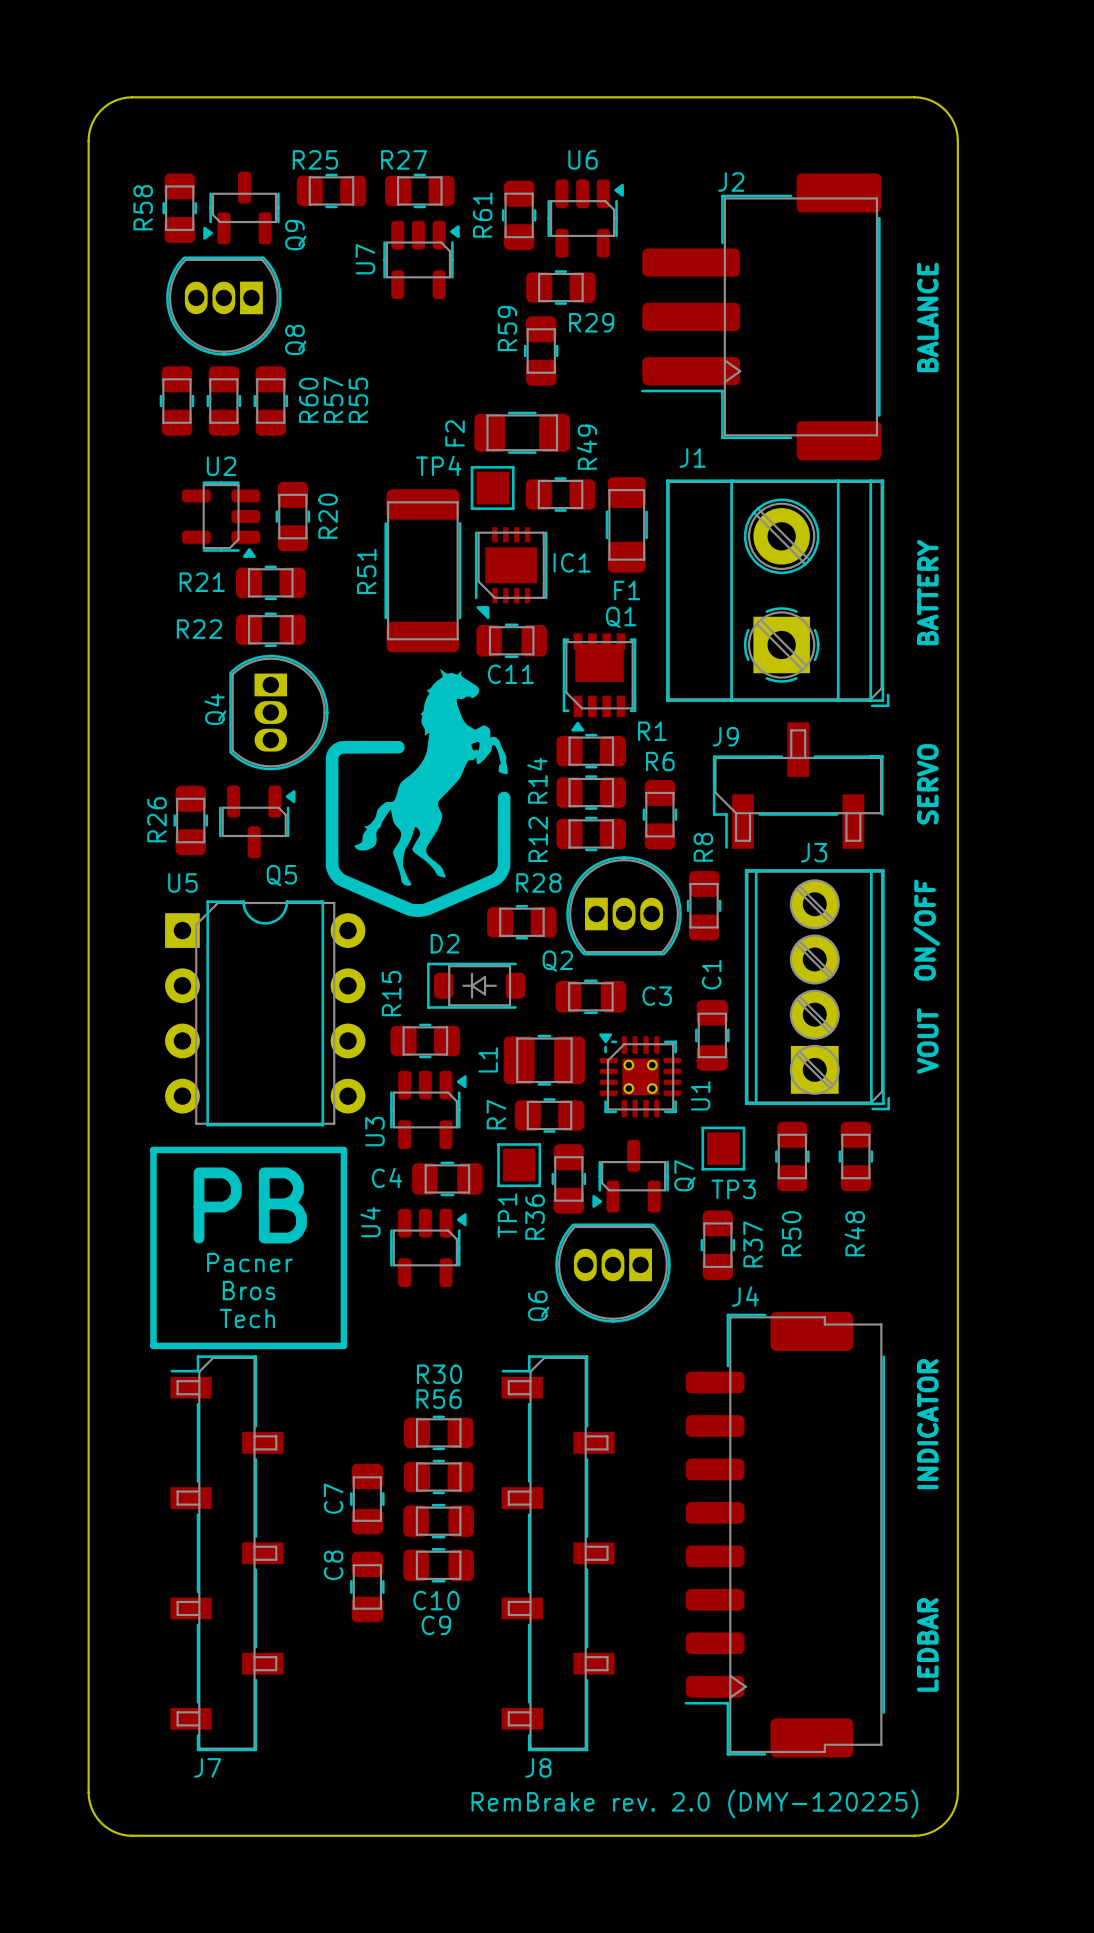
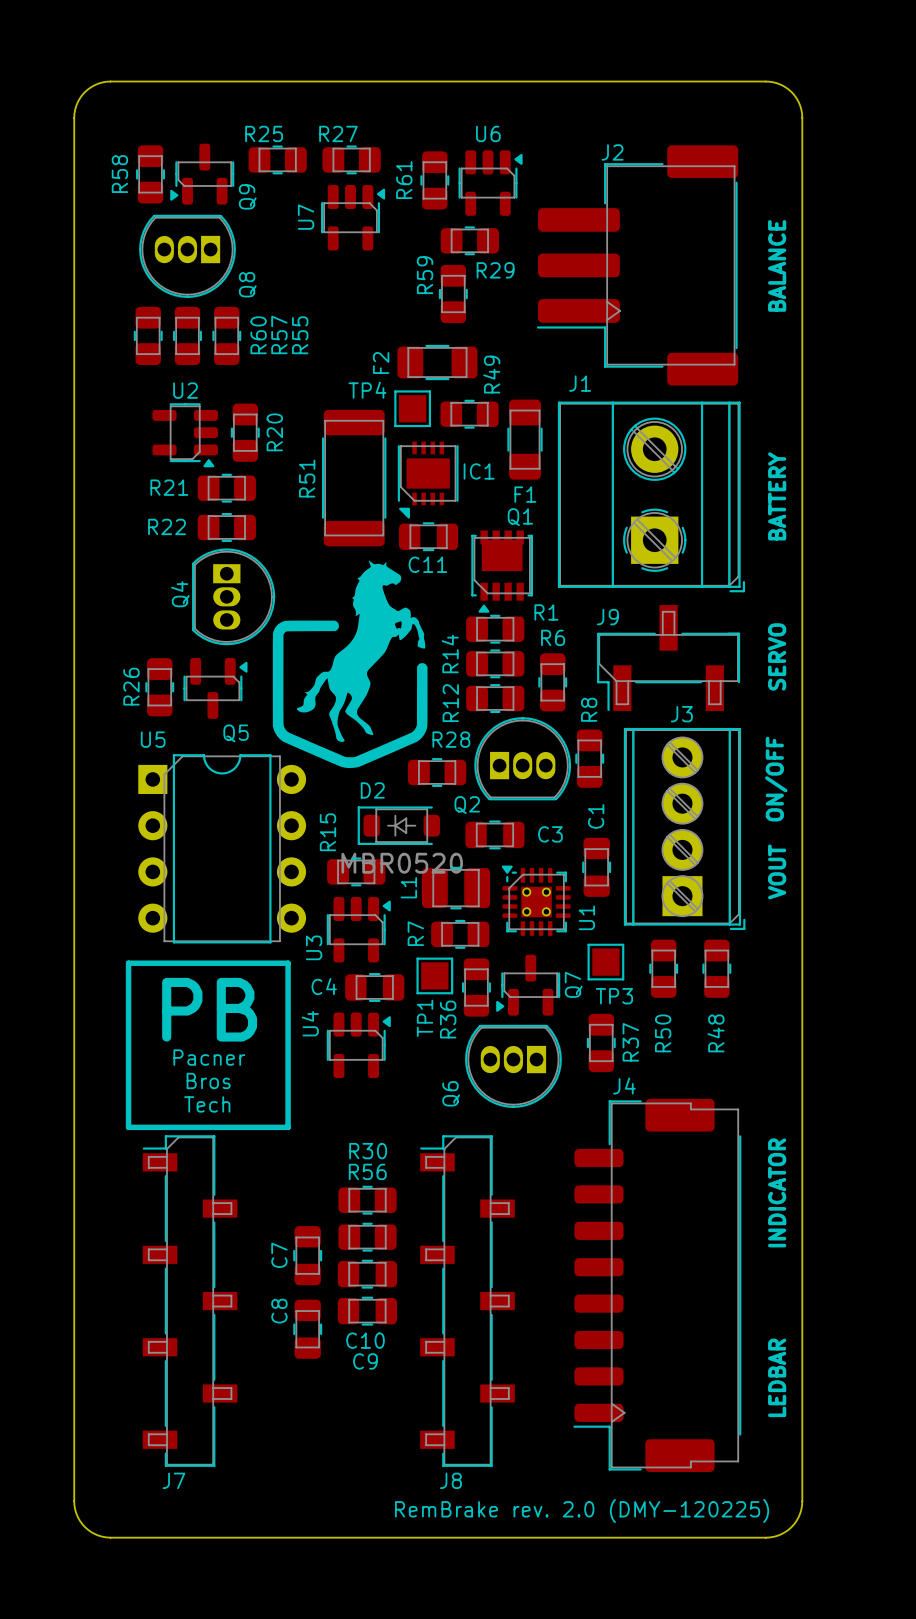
D2 value: none -> MBR0520 (402, 863)

